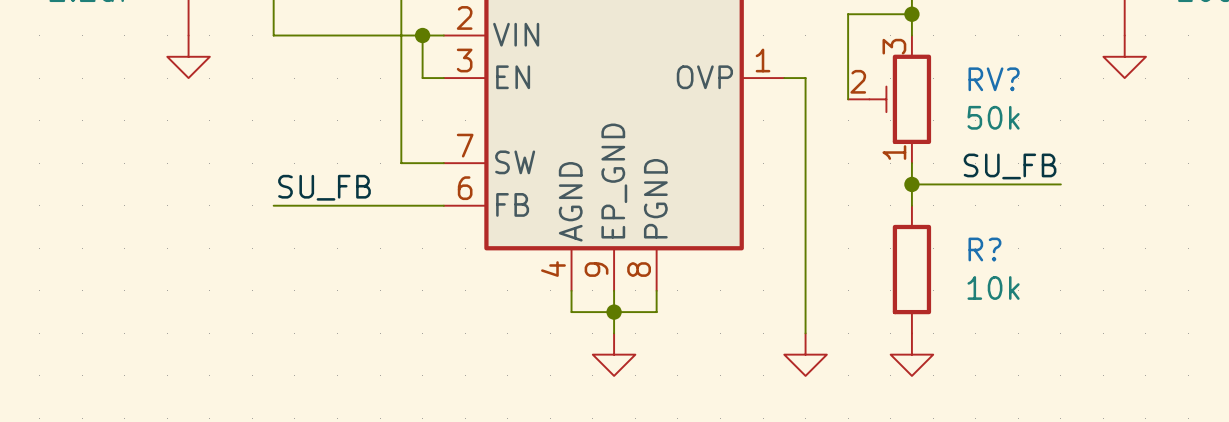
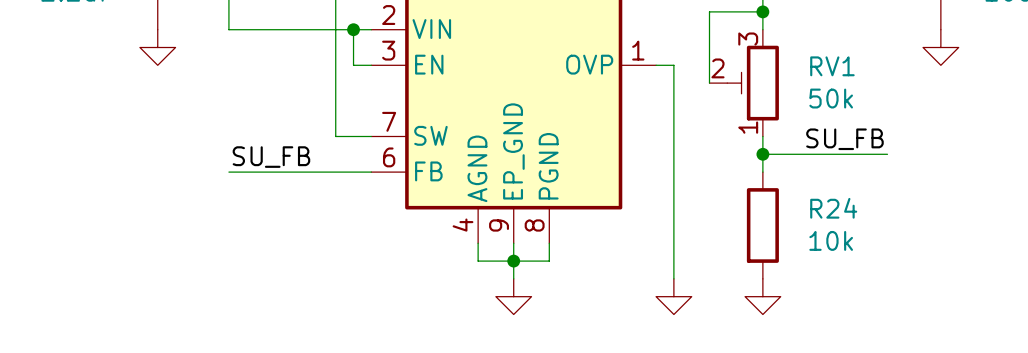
RV? name: RV? (994, 79) -> RV1 (832, 66)
R? name: R? (984, 249) -> R24 (833, 208)

